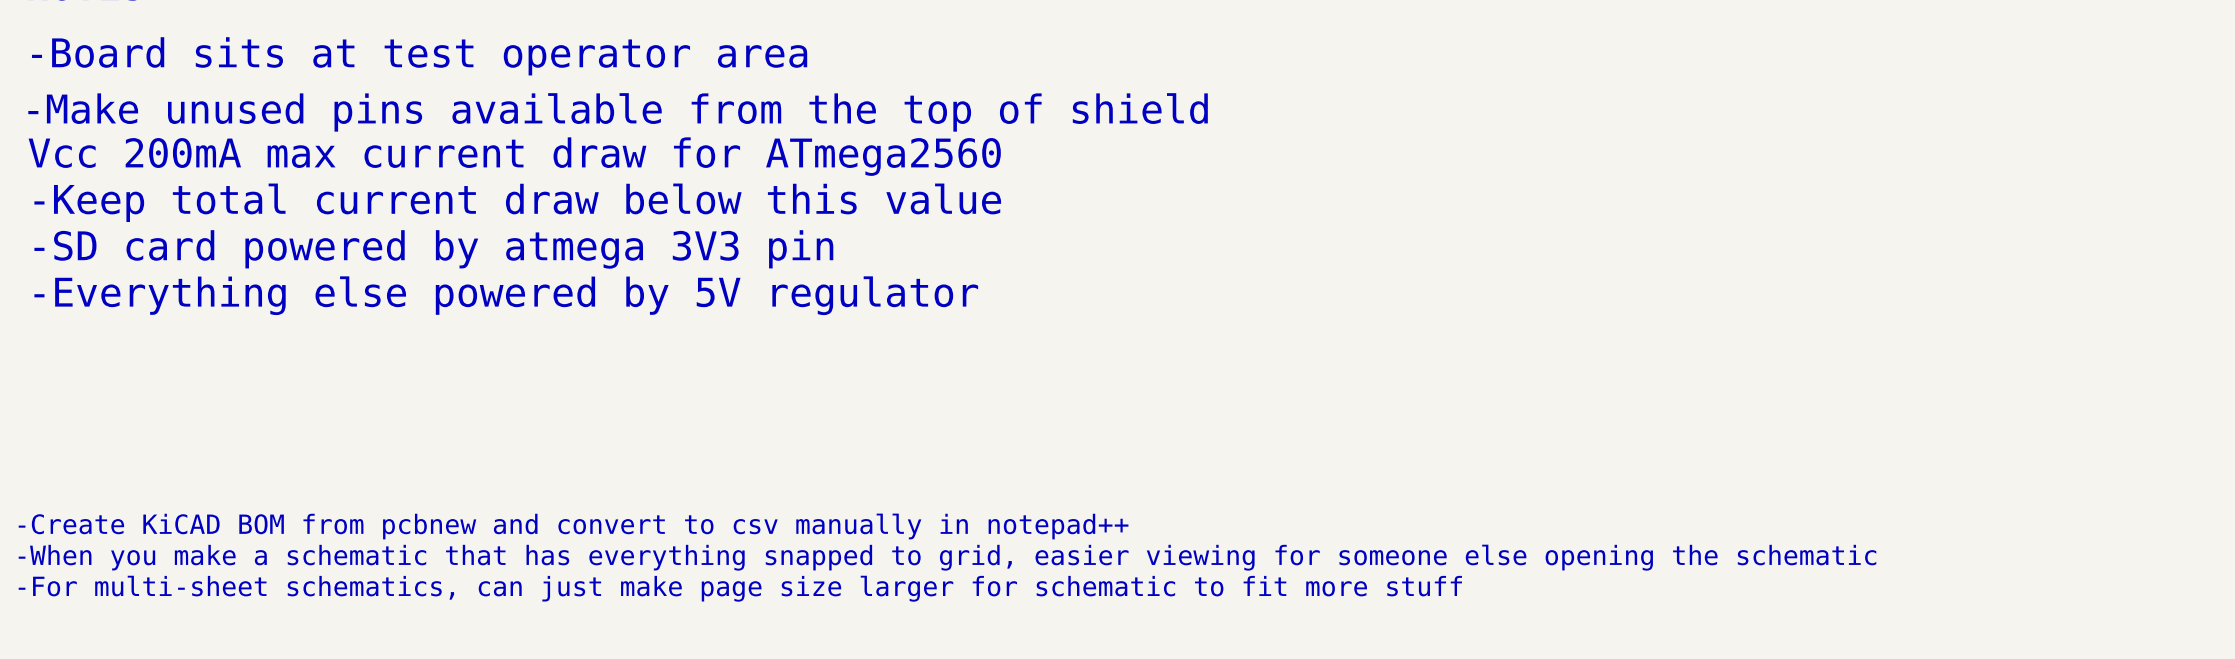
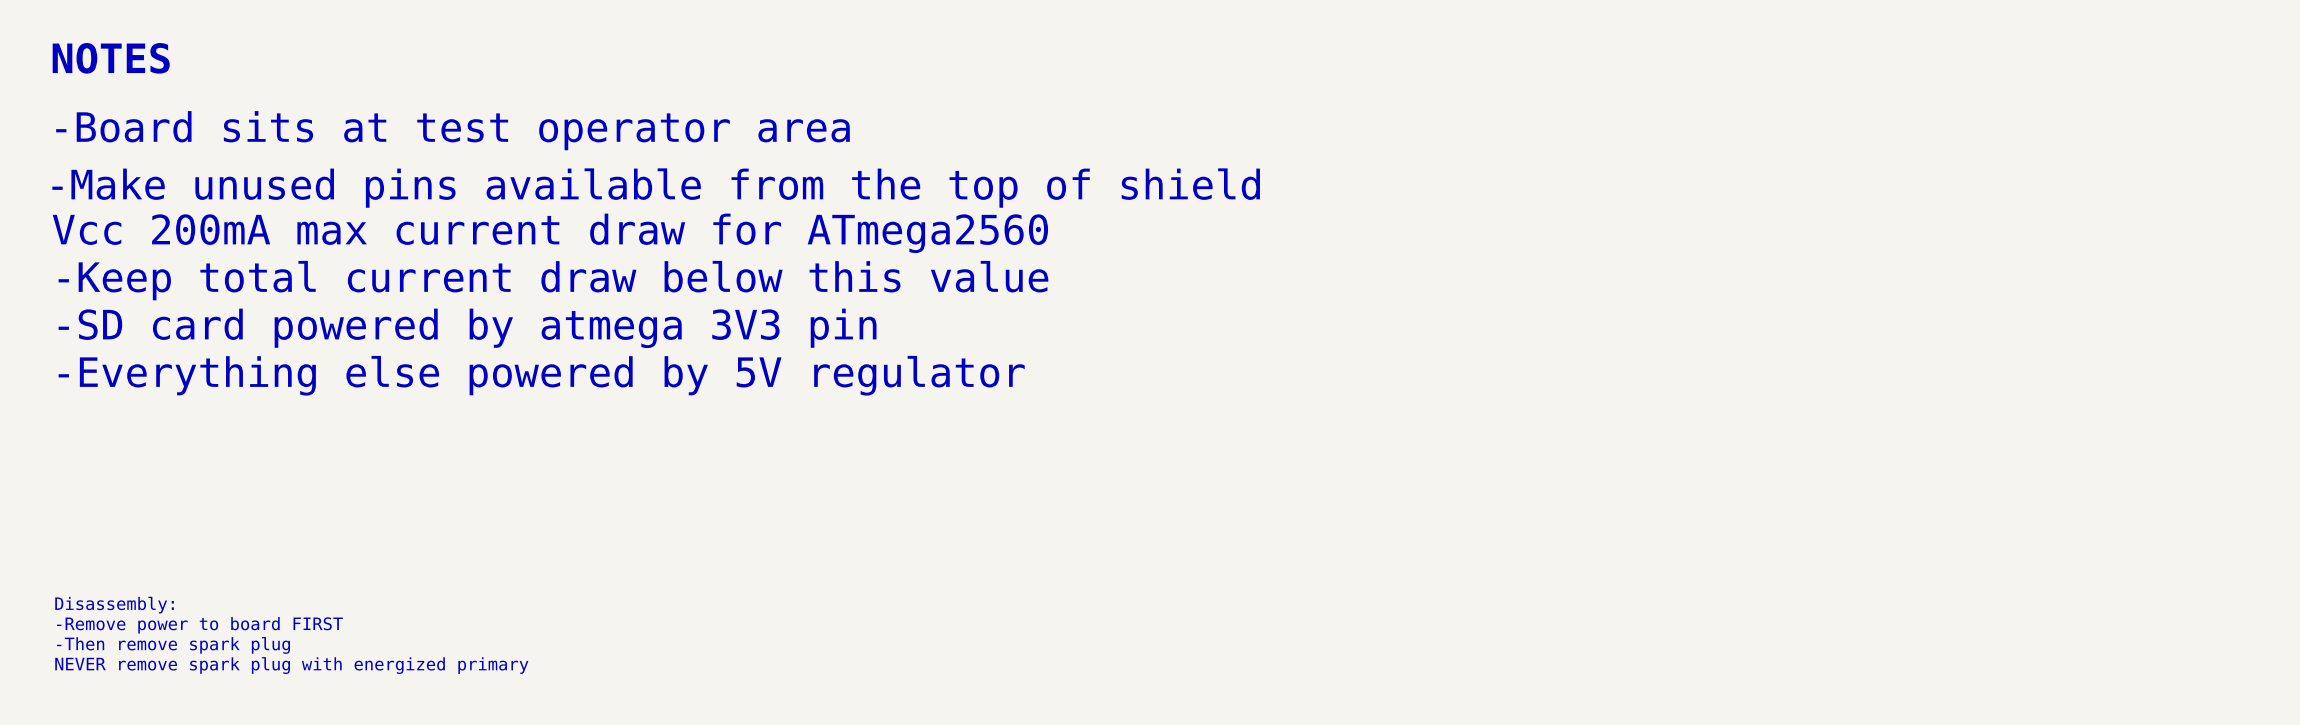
text: none -> Disassembly: (114, 605)
text: -Create KiCAD BOM from pcbnew and convert to csv manually in notepad++ (573, 526) -> none
text: none -> -Remove power to board FIRST (199, 625)
text: -When you make a schematic that has everything snapped to grid, easier viewing for someone else opening the schematic (947, 557) -> none
text: none -> -Then remove spark plug (173, 645)
text: none -> NEVER remove spark plug with energized primary (291, 665)
text: -For multi-sheet schematics, can just make page size larger for schematic to fit more stuff (740, 588) -> none

